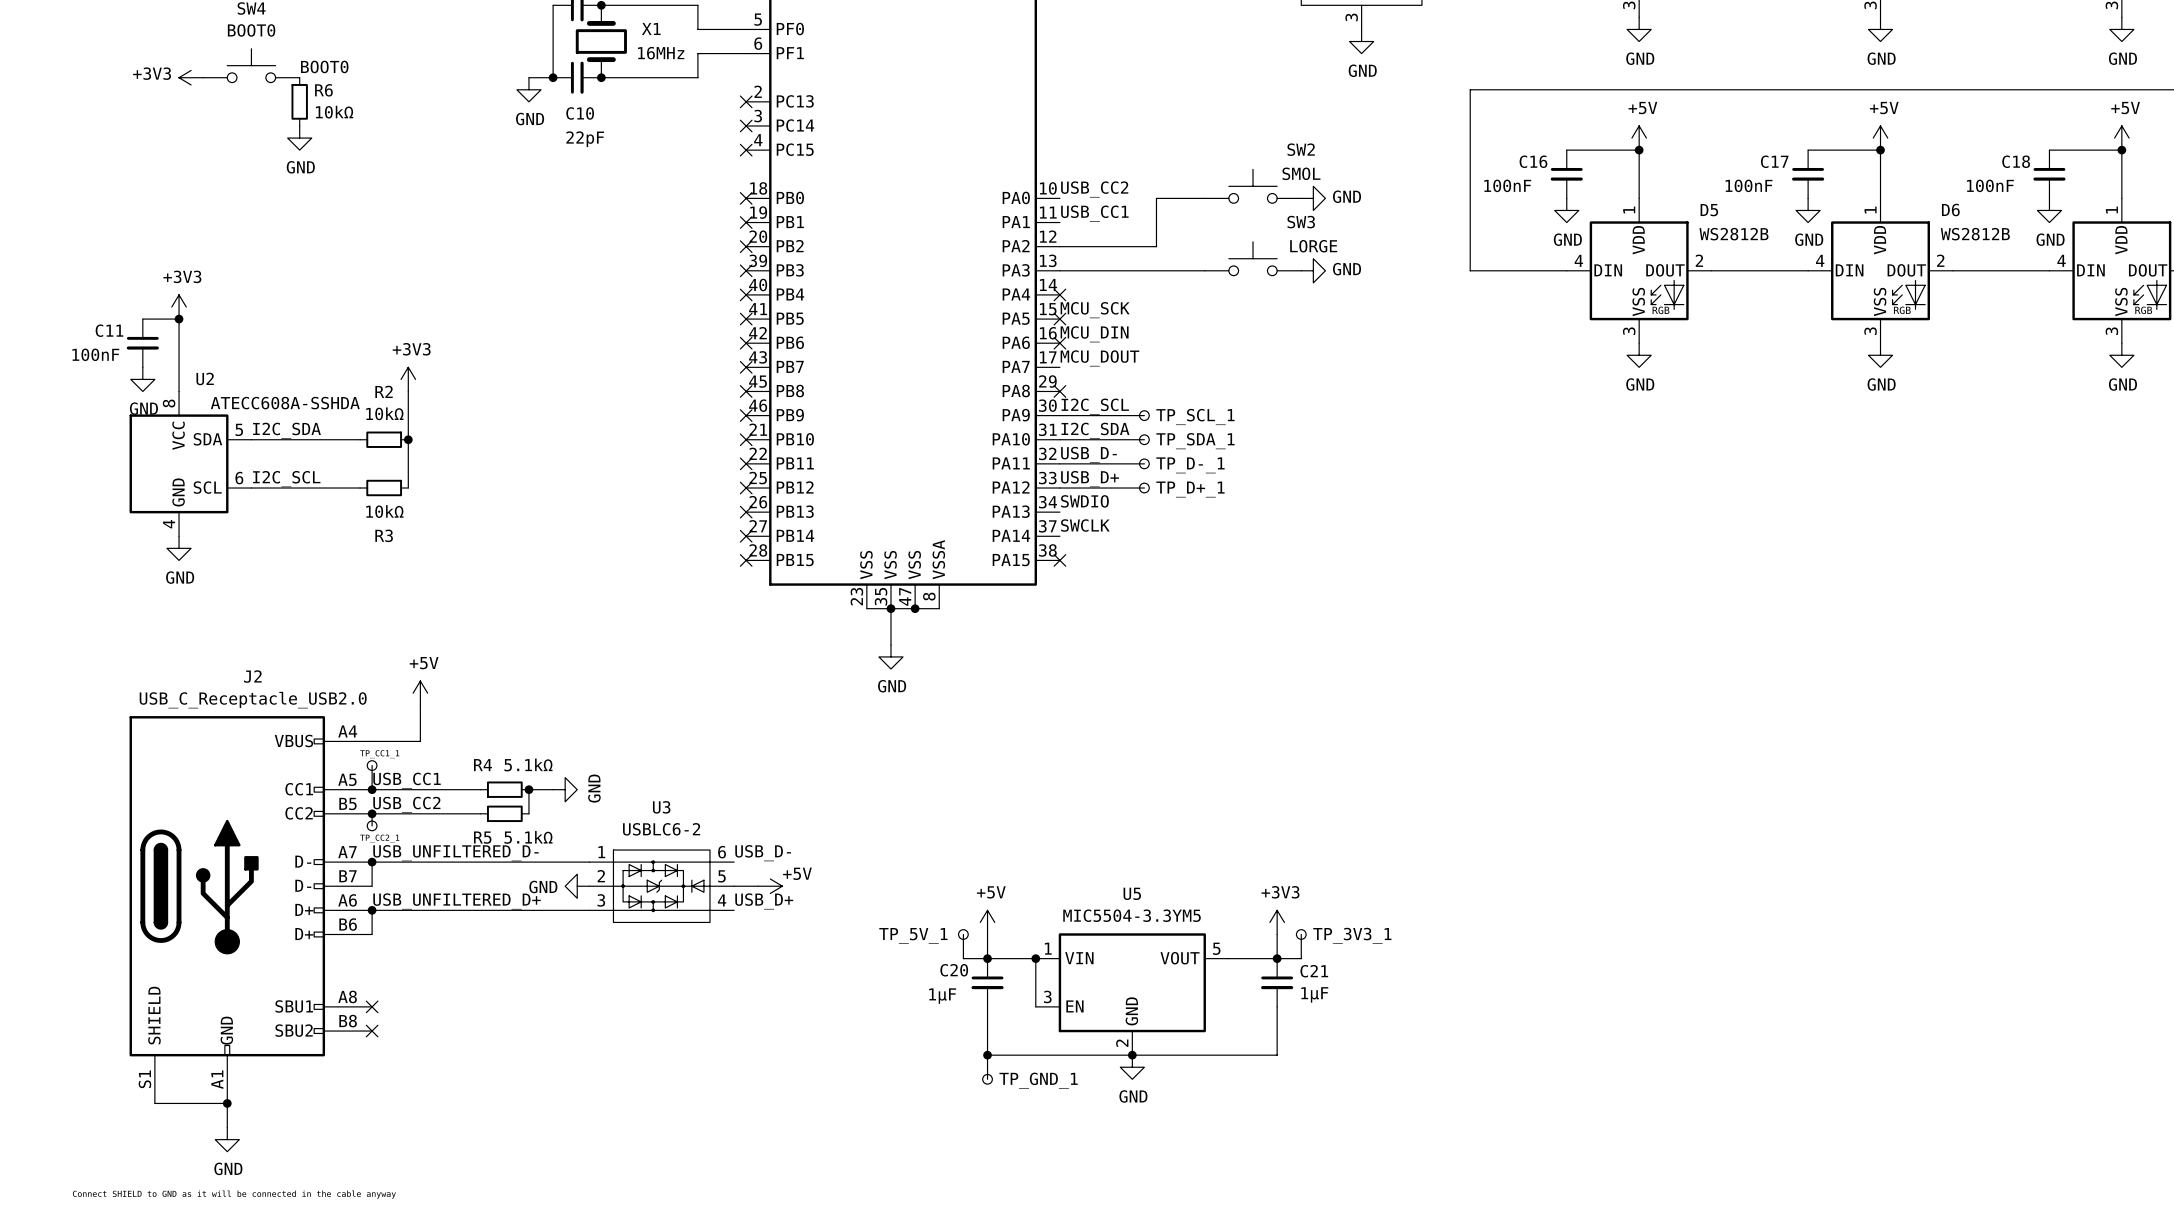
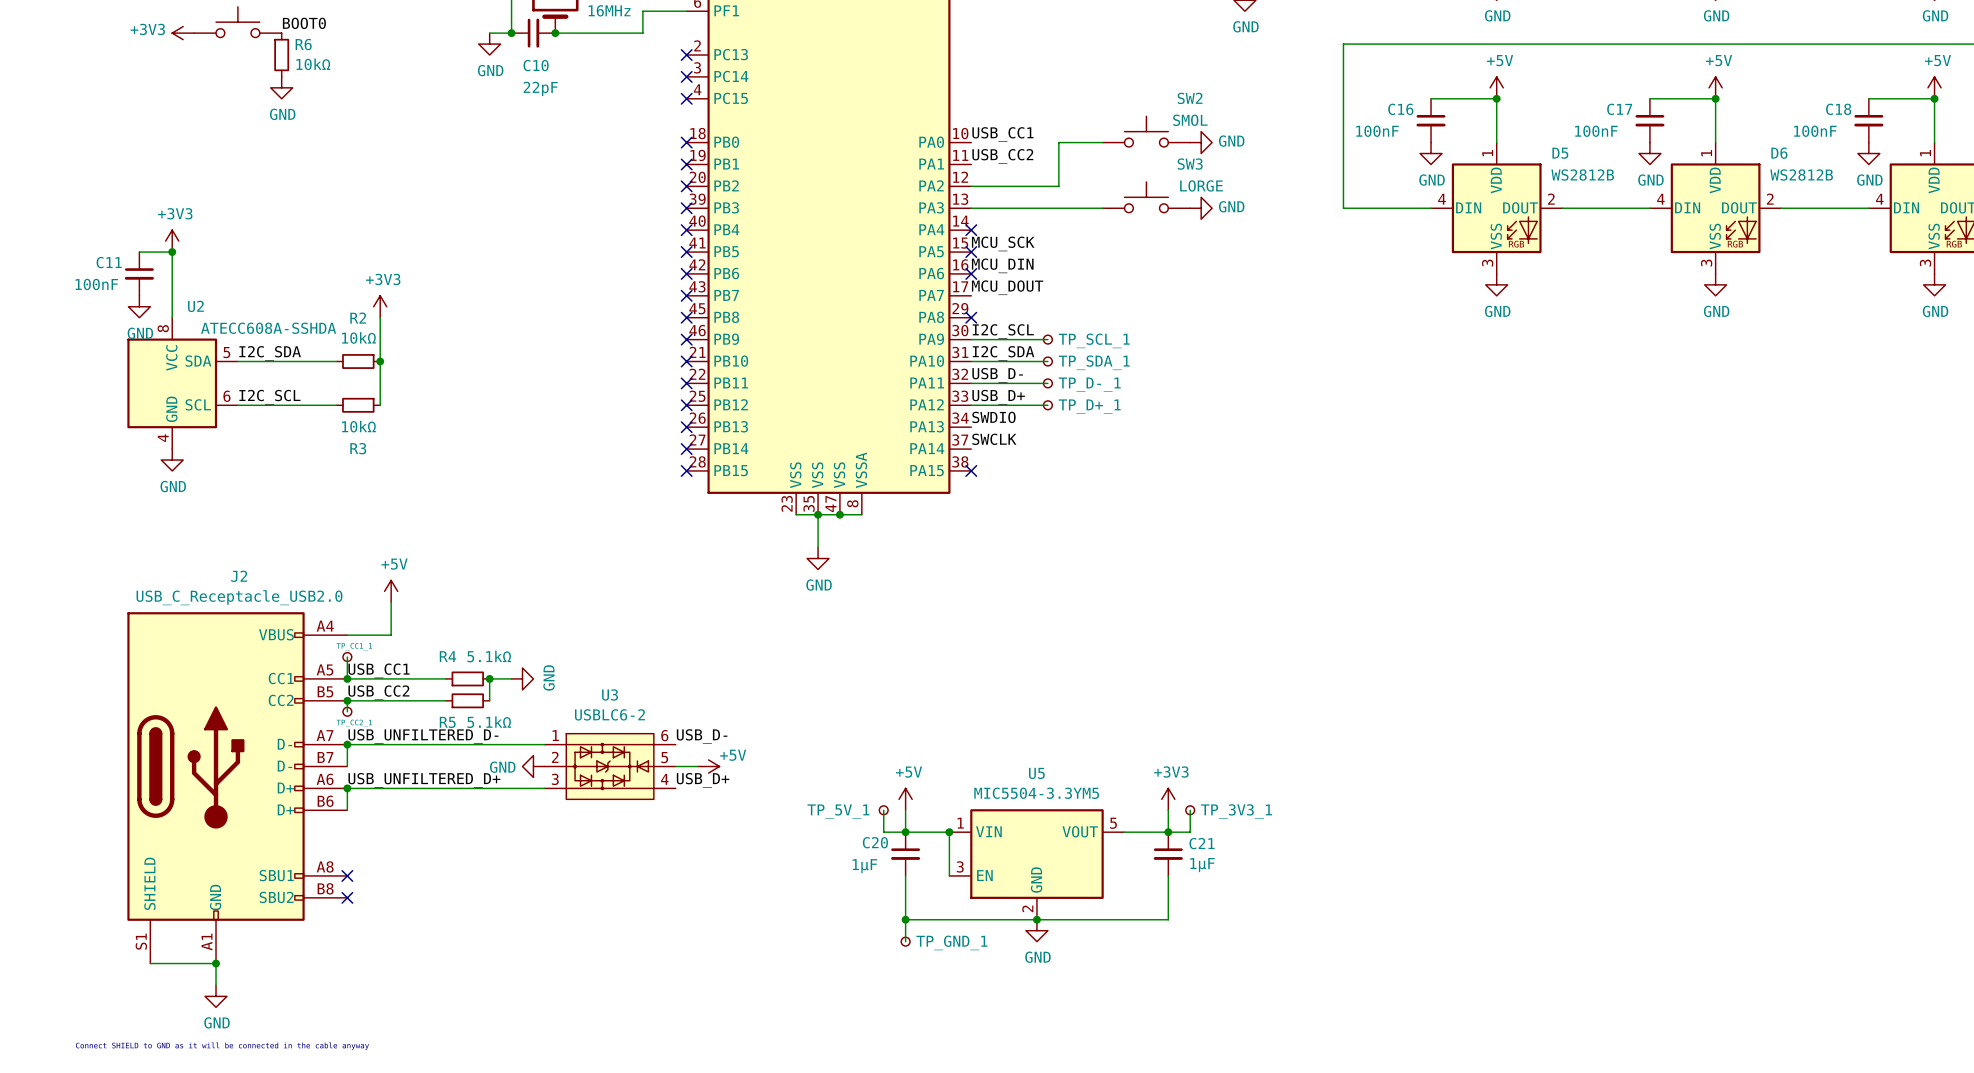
label: USB_CC2 (1094, 189) -> USB_CC1 (1002, 134)
label: USB_CC1 (1094, 213) -> USB_CC2 (1002, 156)

